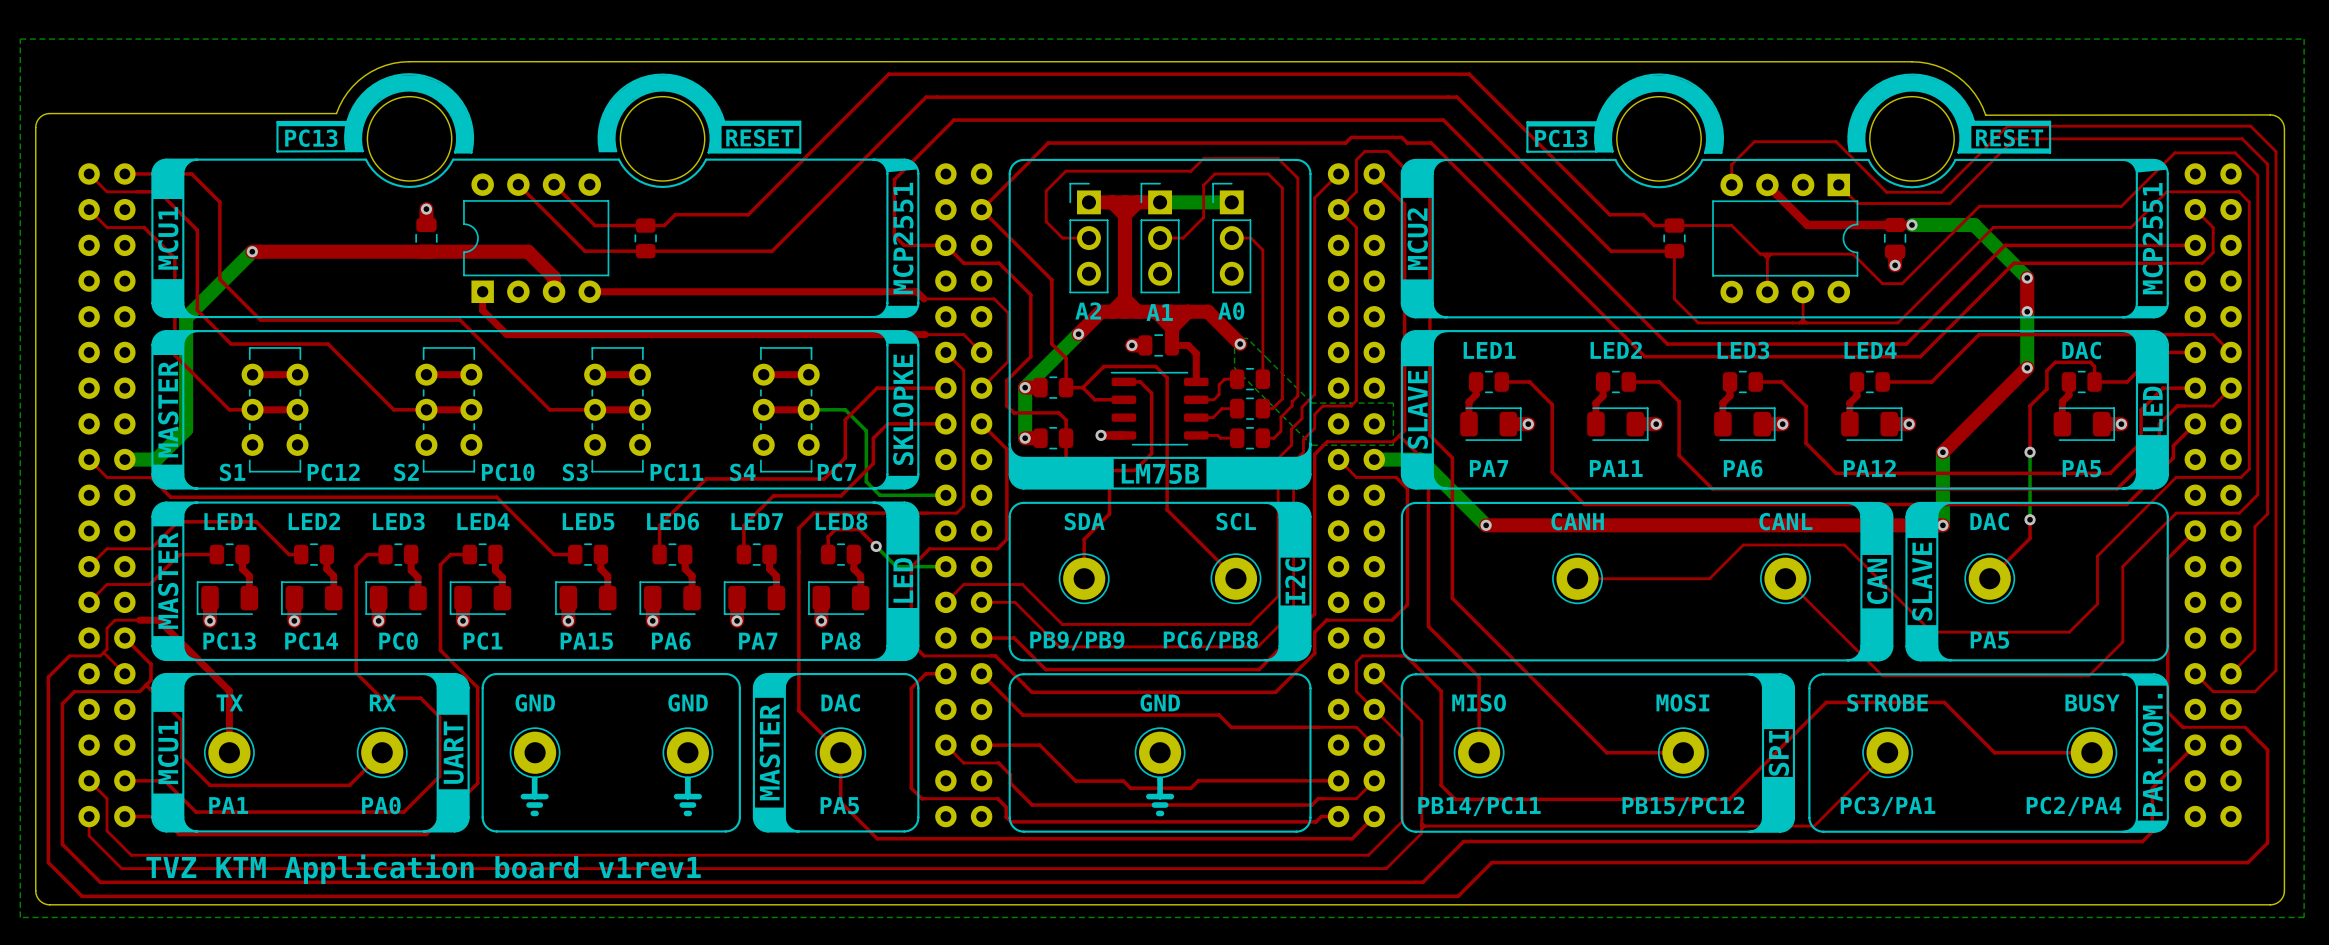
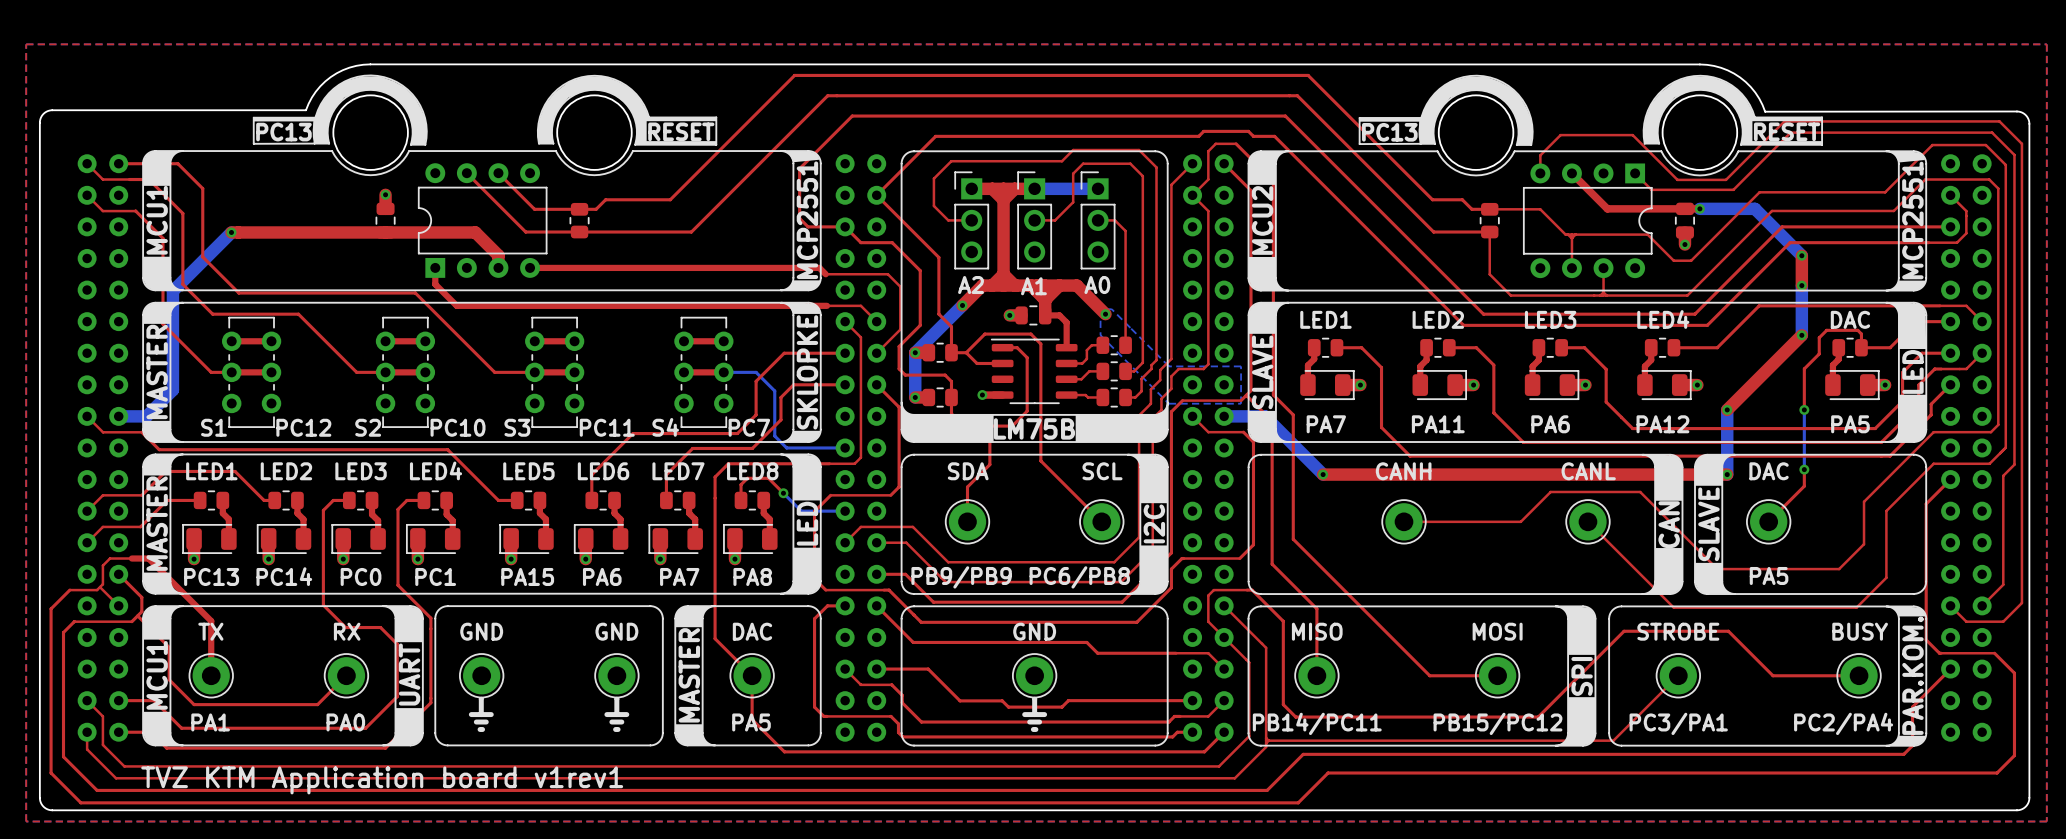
top zone outline: none -> (26, 44) (2046, 44) (2046, 821) (26, 821) (26, 44)

